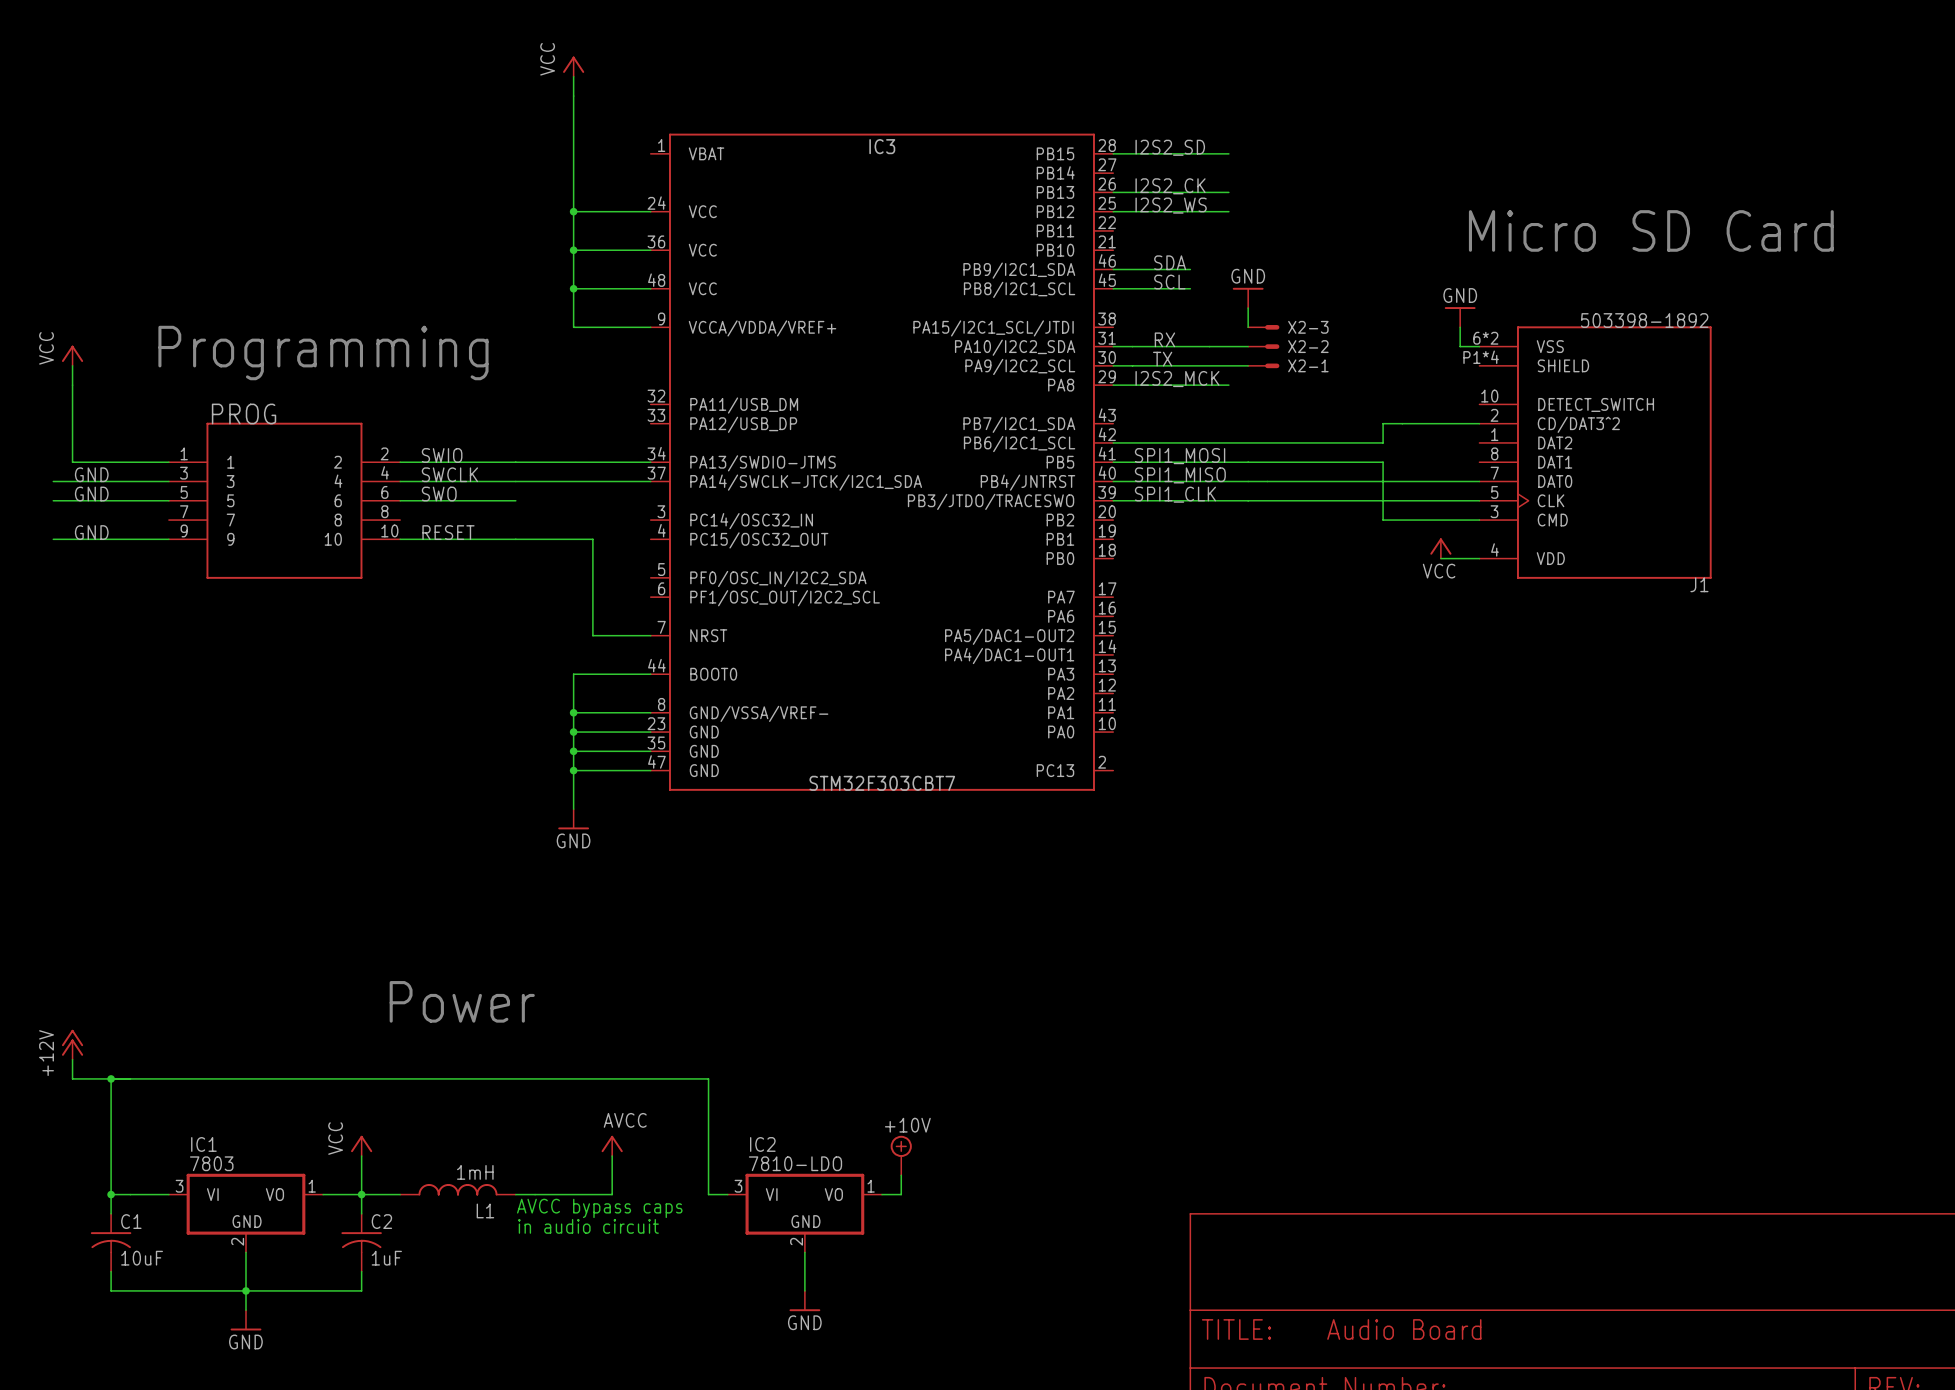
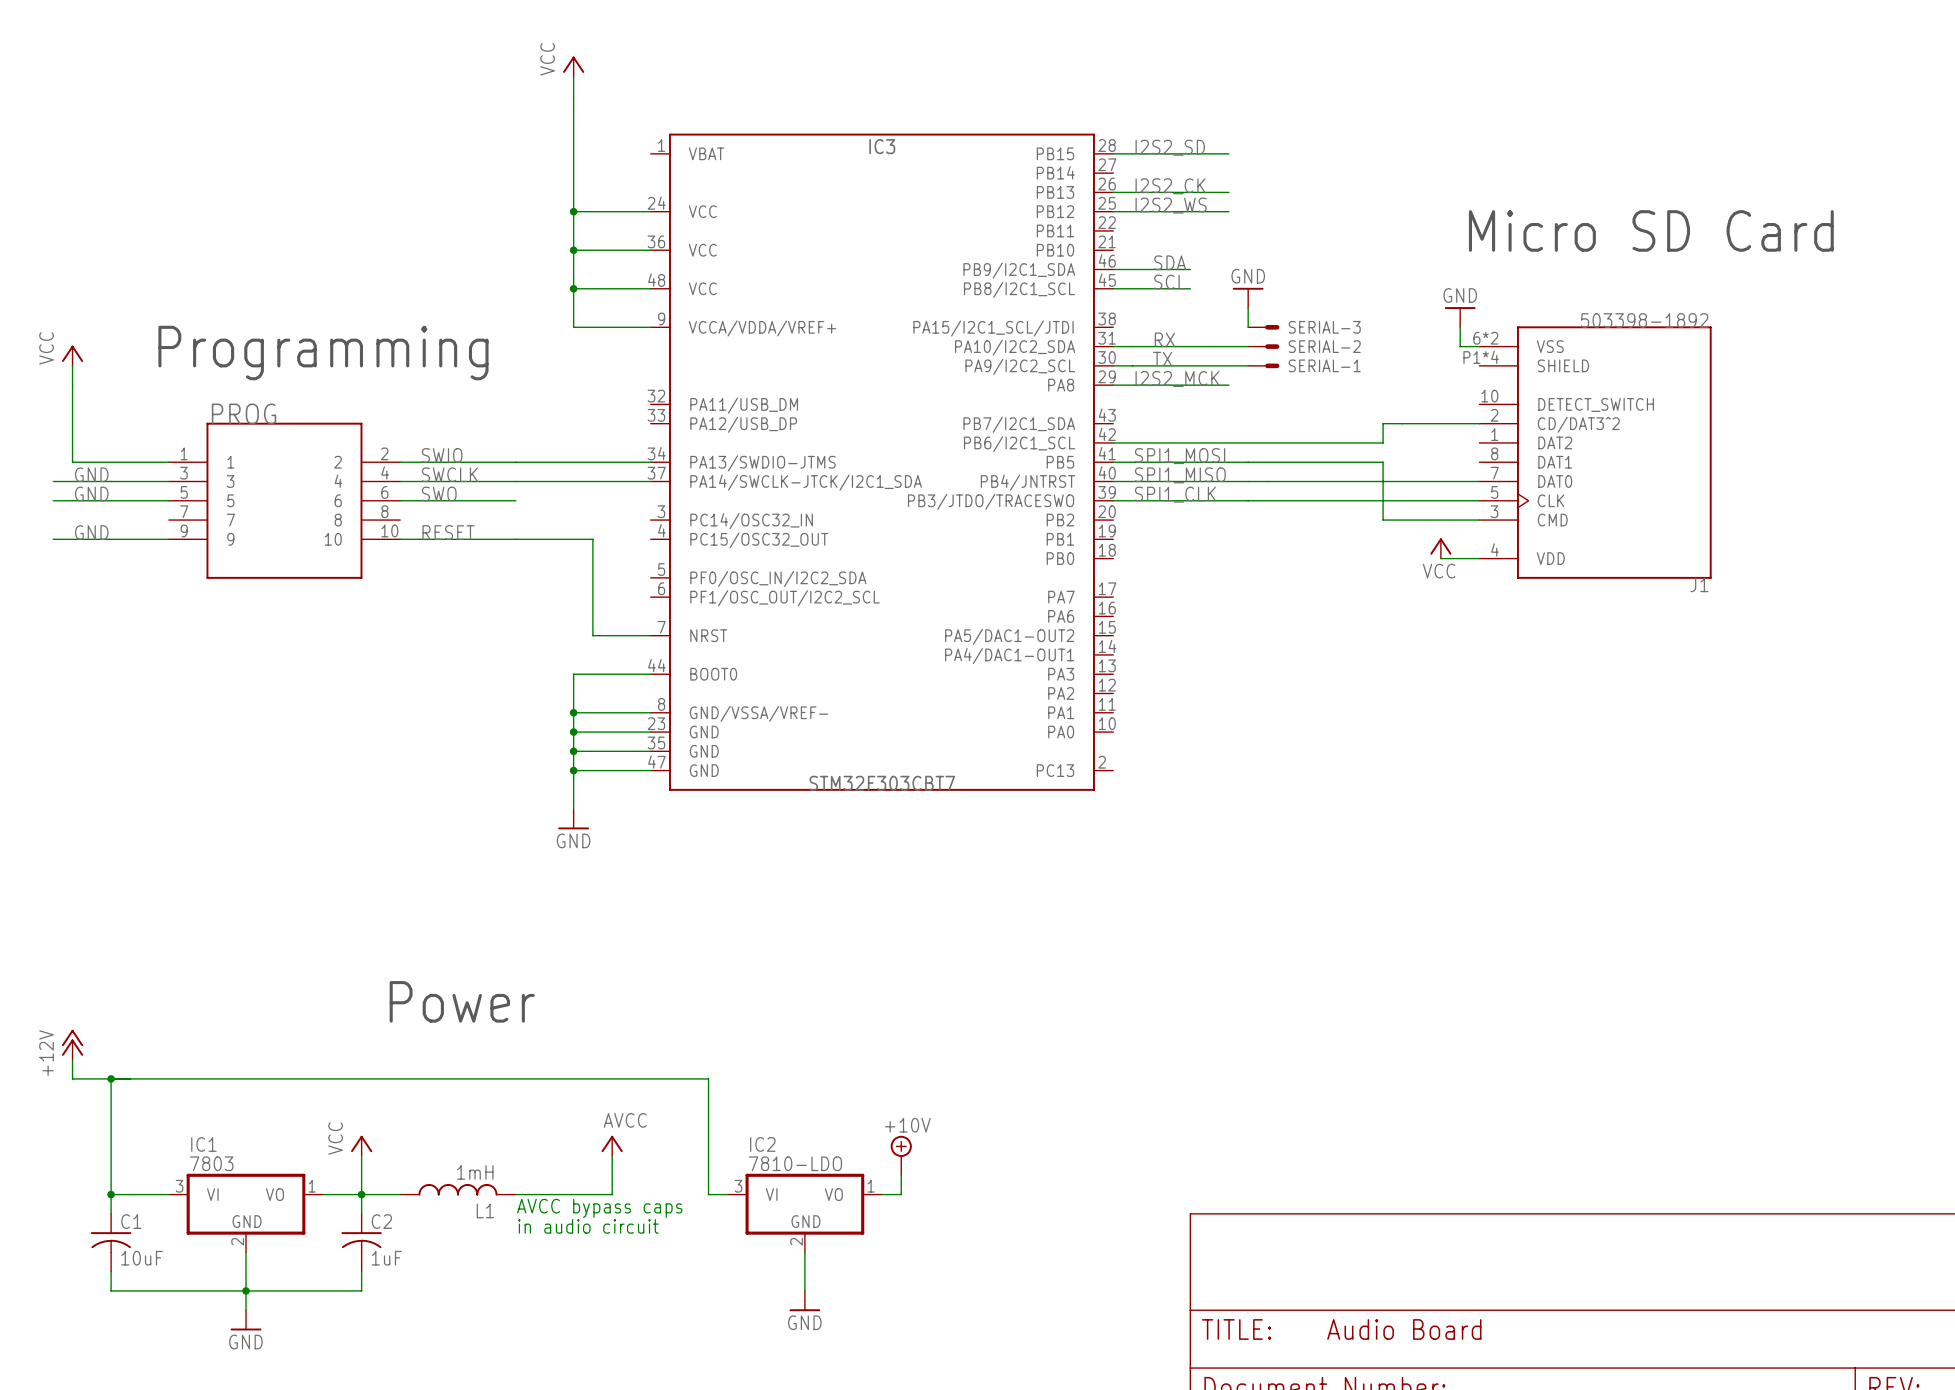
X2-3 name: X2-3 (1308, 327) -> SERIAL-3 (1324, 327)
X2-2 name: X2-2 (1308, 346) -> SERIAL-2 (1324, 346)
X2-1 name: X2-1 (1308, 365) -> SERIAL-1 (1324, 365)

